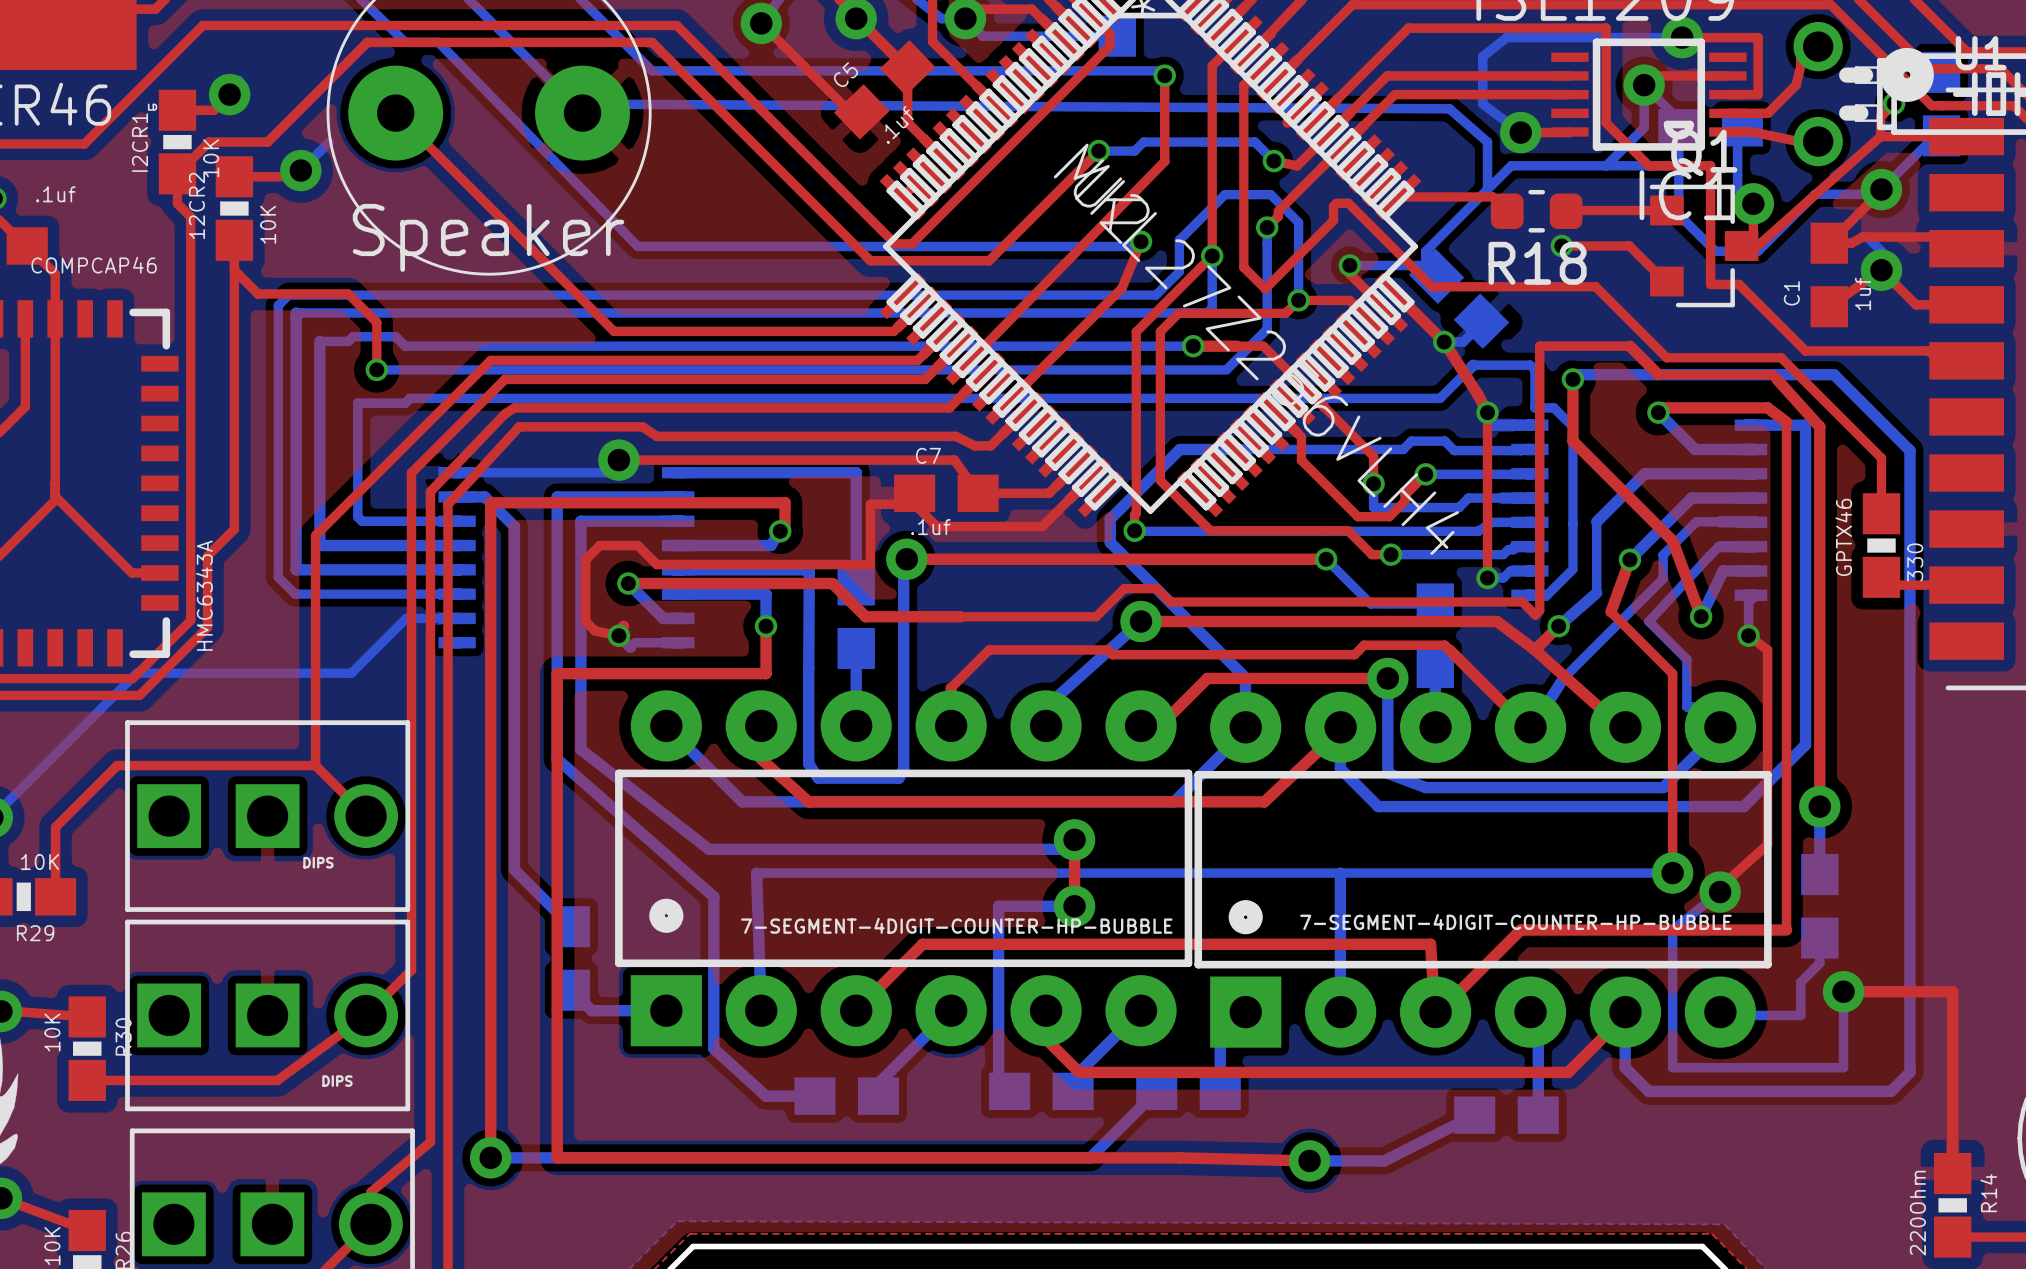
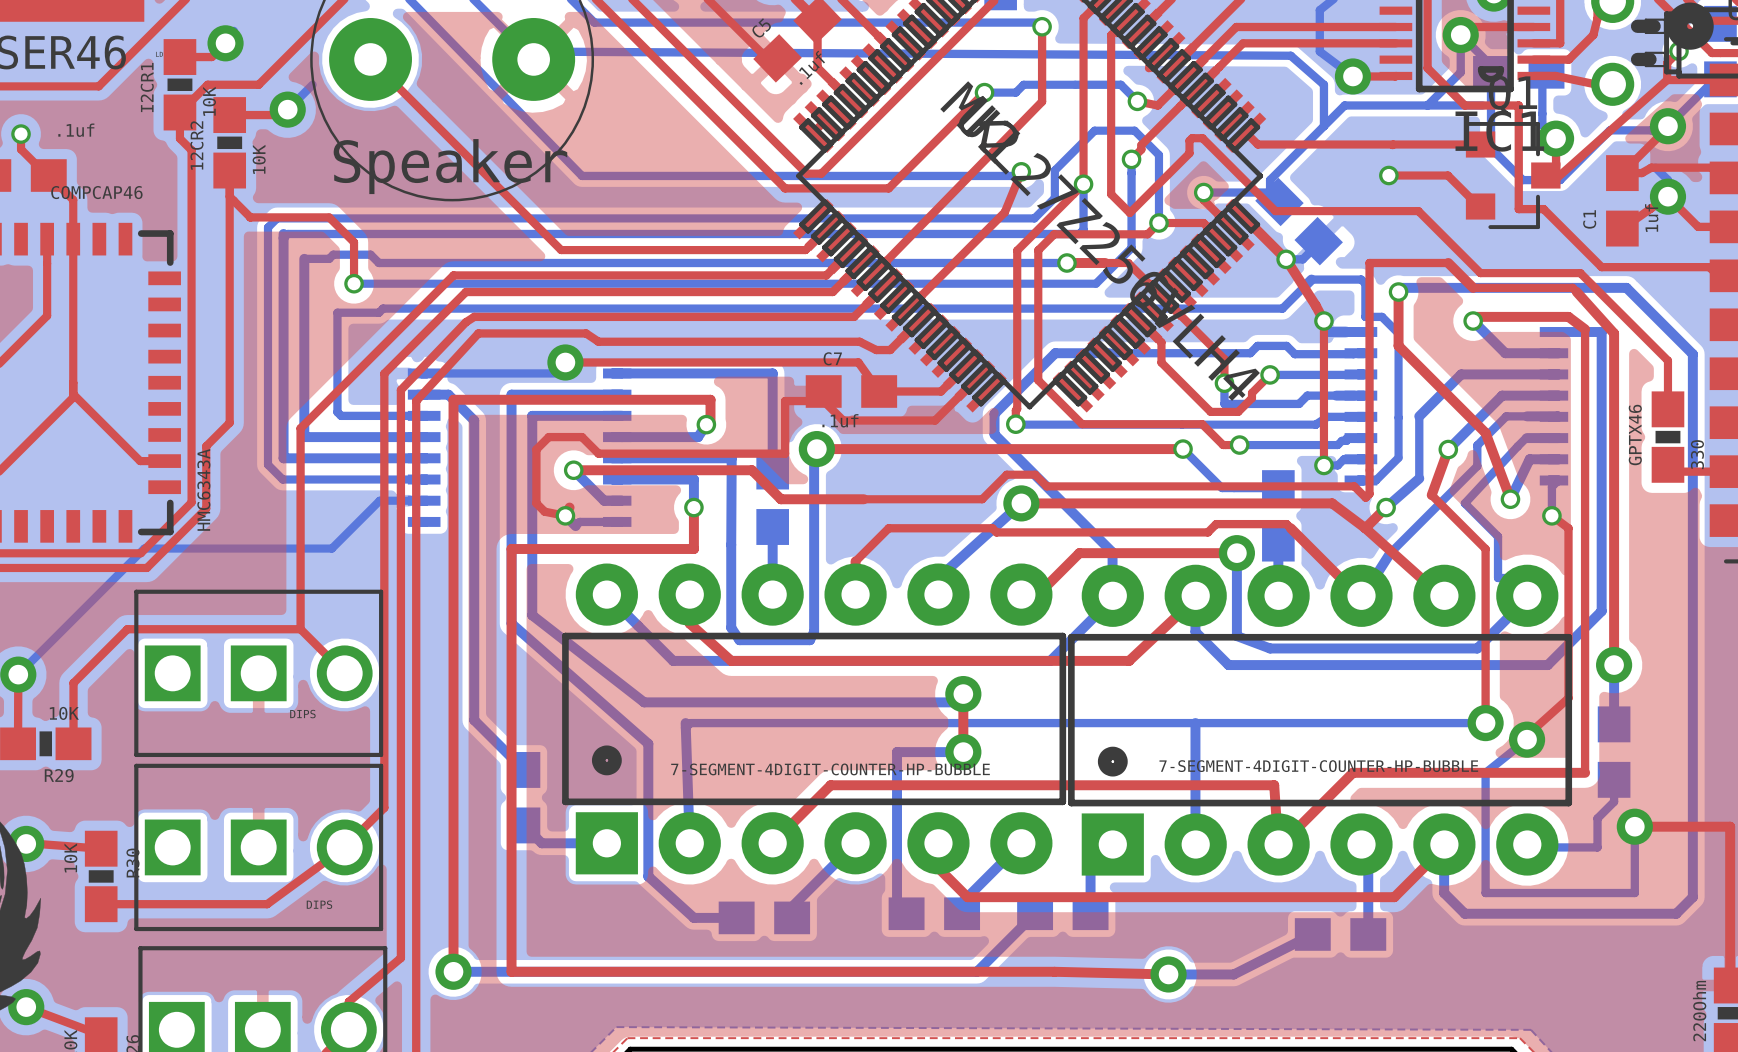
top track: (1398, 196) (1492, 196) (1507, 211) -> (1246, 132) (1257, 144) (1393, 144)
R18: (1536, 211) -> none

